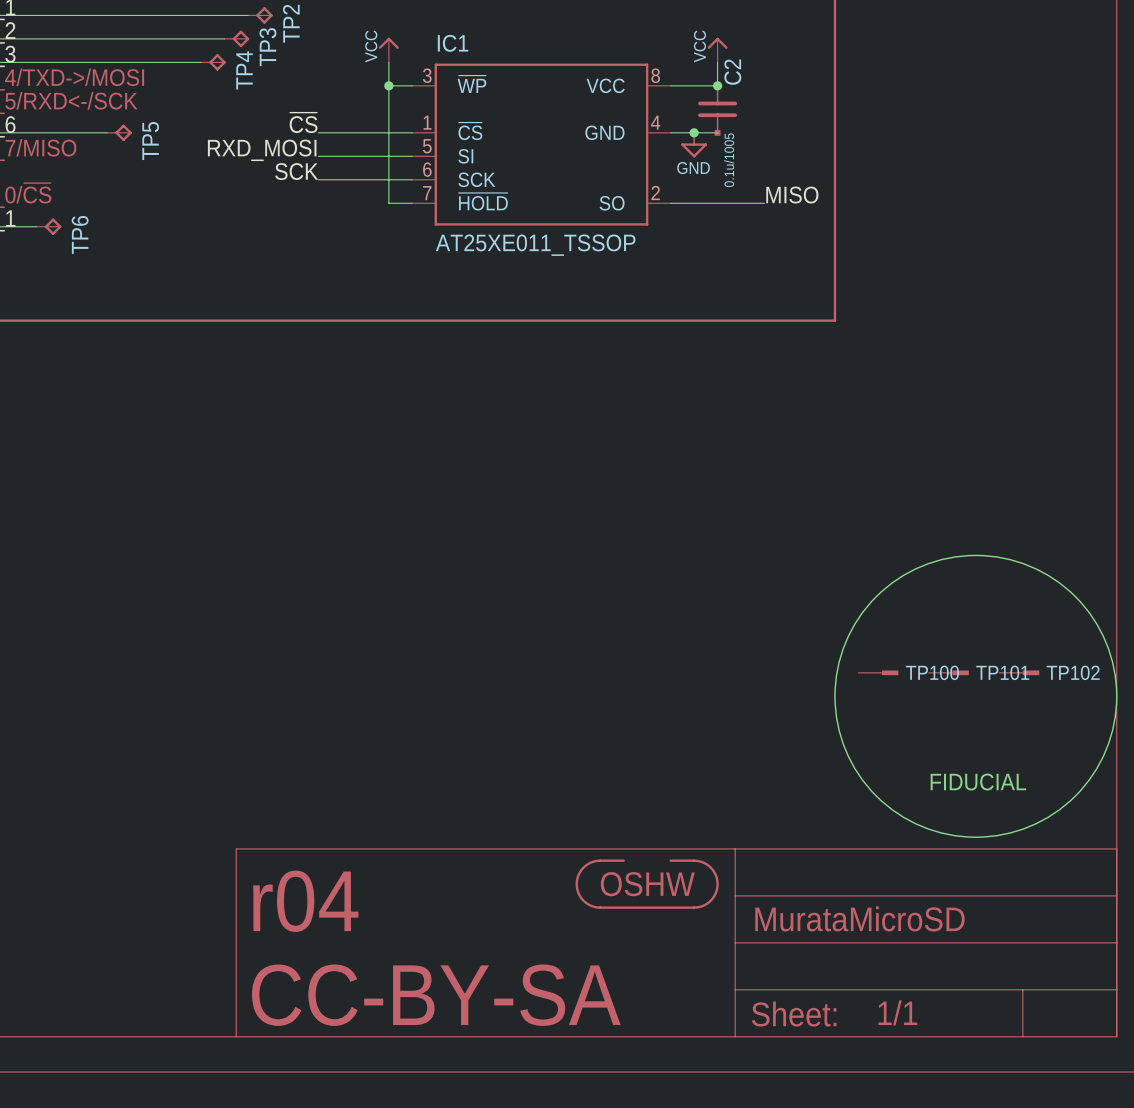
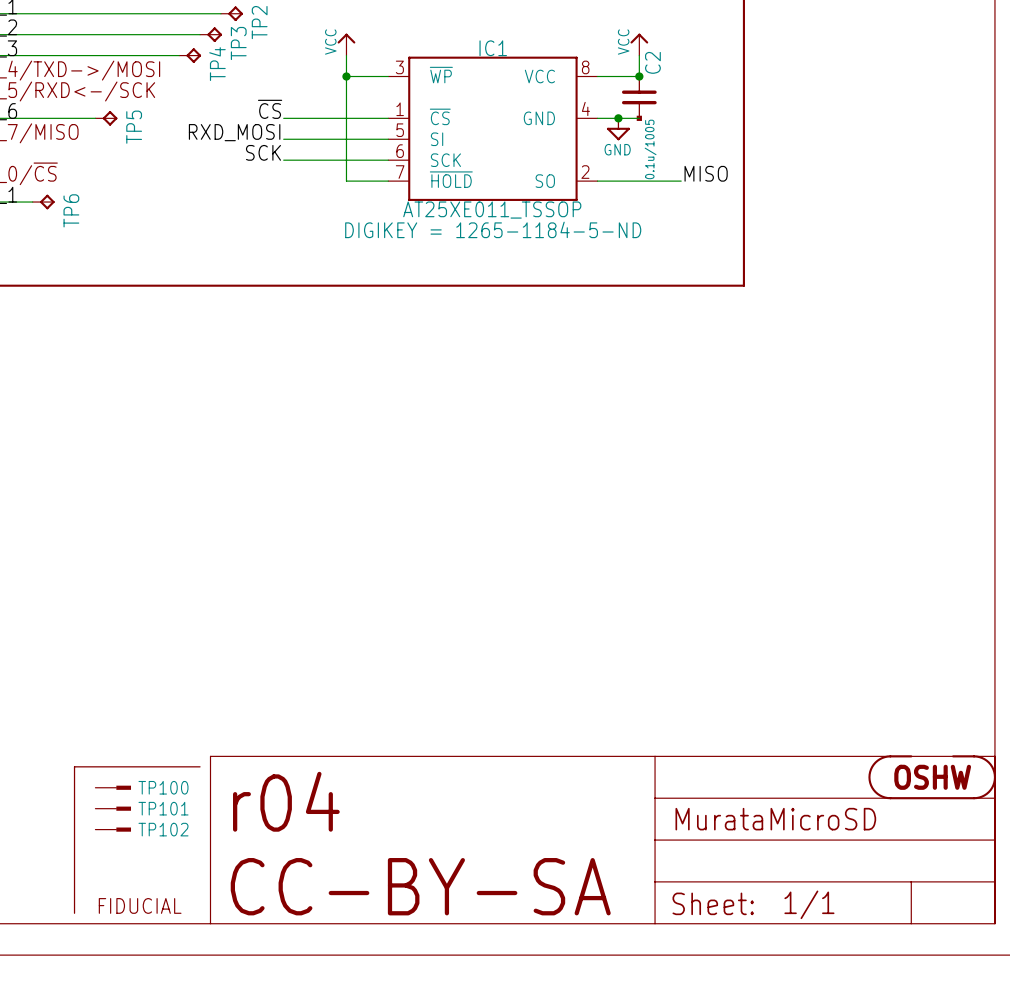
IC1 name position: IC1 (453, 43) -> IC1 (493, 48)
IC1 symbol: [412, 63, 671, 226] -> [388, 56, 598, 201]
IC1 text: none -> DIGIKEY = 1265-1184-5-ND (493, 229)
drawing: [834, 554, 1118, 838] -> none
TP100 position: (878, 672) -> (113, 787)
TP101 position: (948, 672) -> (113, 808)
TP102 position: (1019, 672) -> (113, 829)
text: FIDUCIAL (978, 782) -> none
line: none -> (200, 766) (74, 766) (74, 913)
part: none -> (932, 777)
part: (647, 884) -> none
text: none -> FIDUCIAL (140, 905)

